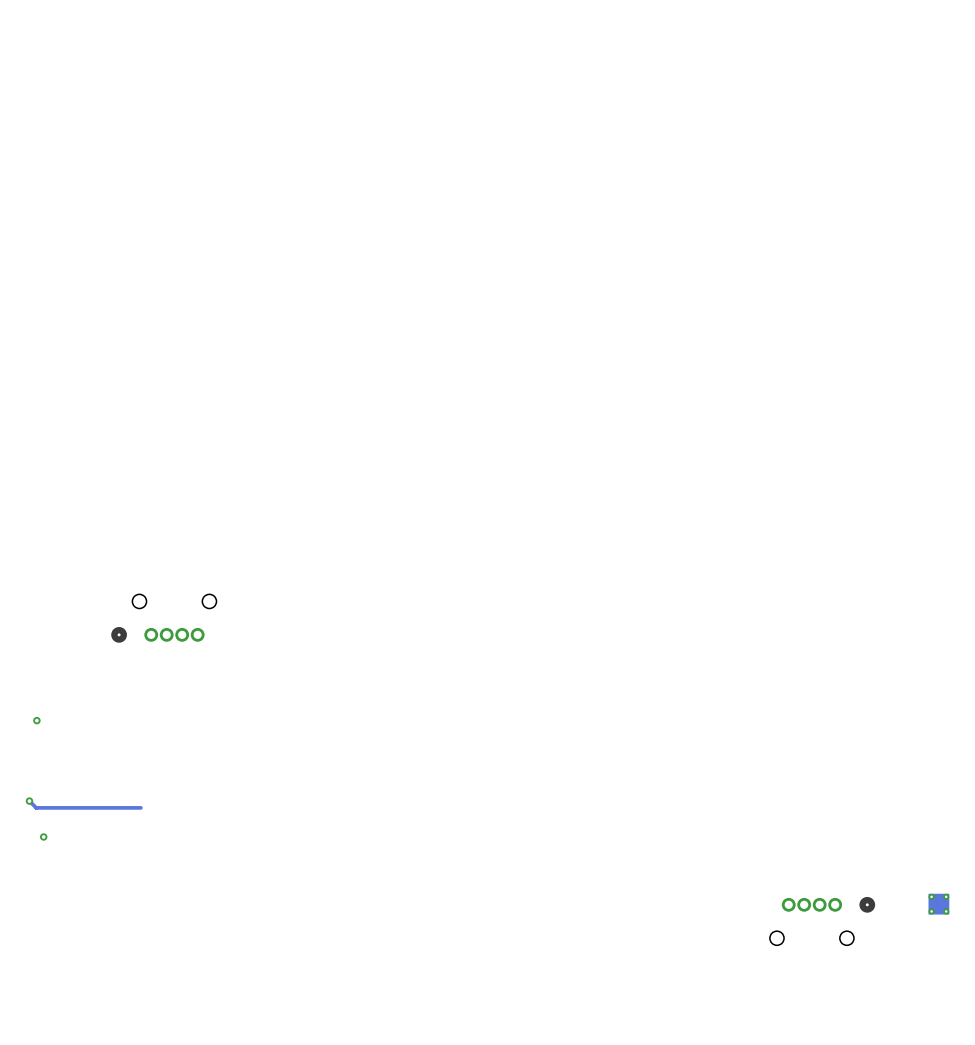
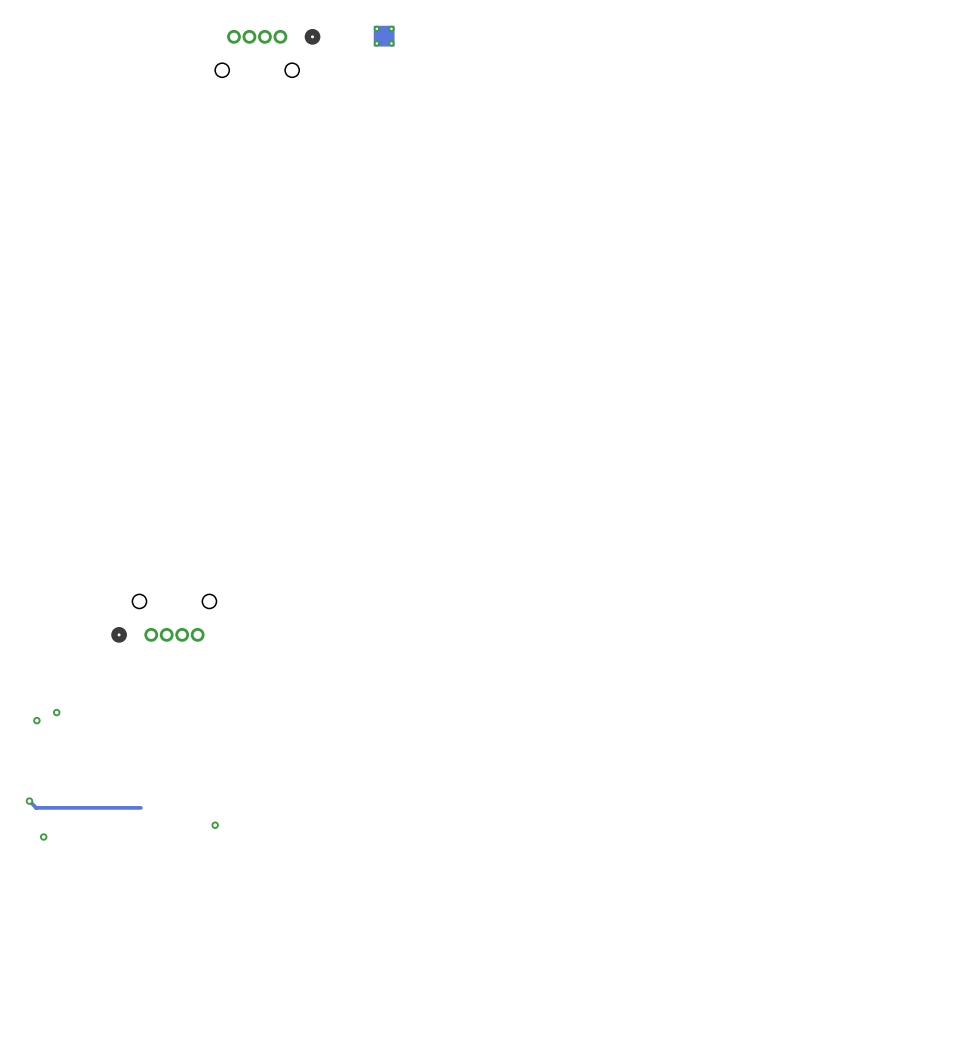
part: none -> (384, 36)
part: none -> (267, 53)
via: none -> (56, 712)
via: none -> (215, 825)
part: (938, 904) -> none
part: (822, 921) -> none

